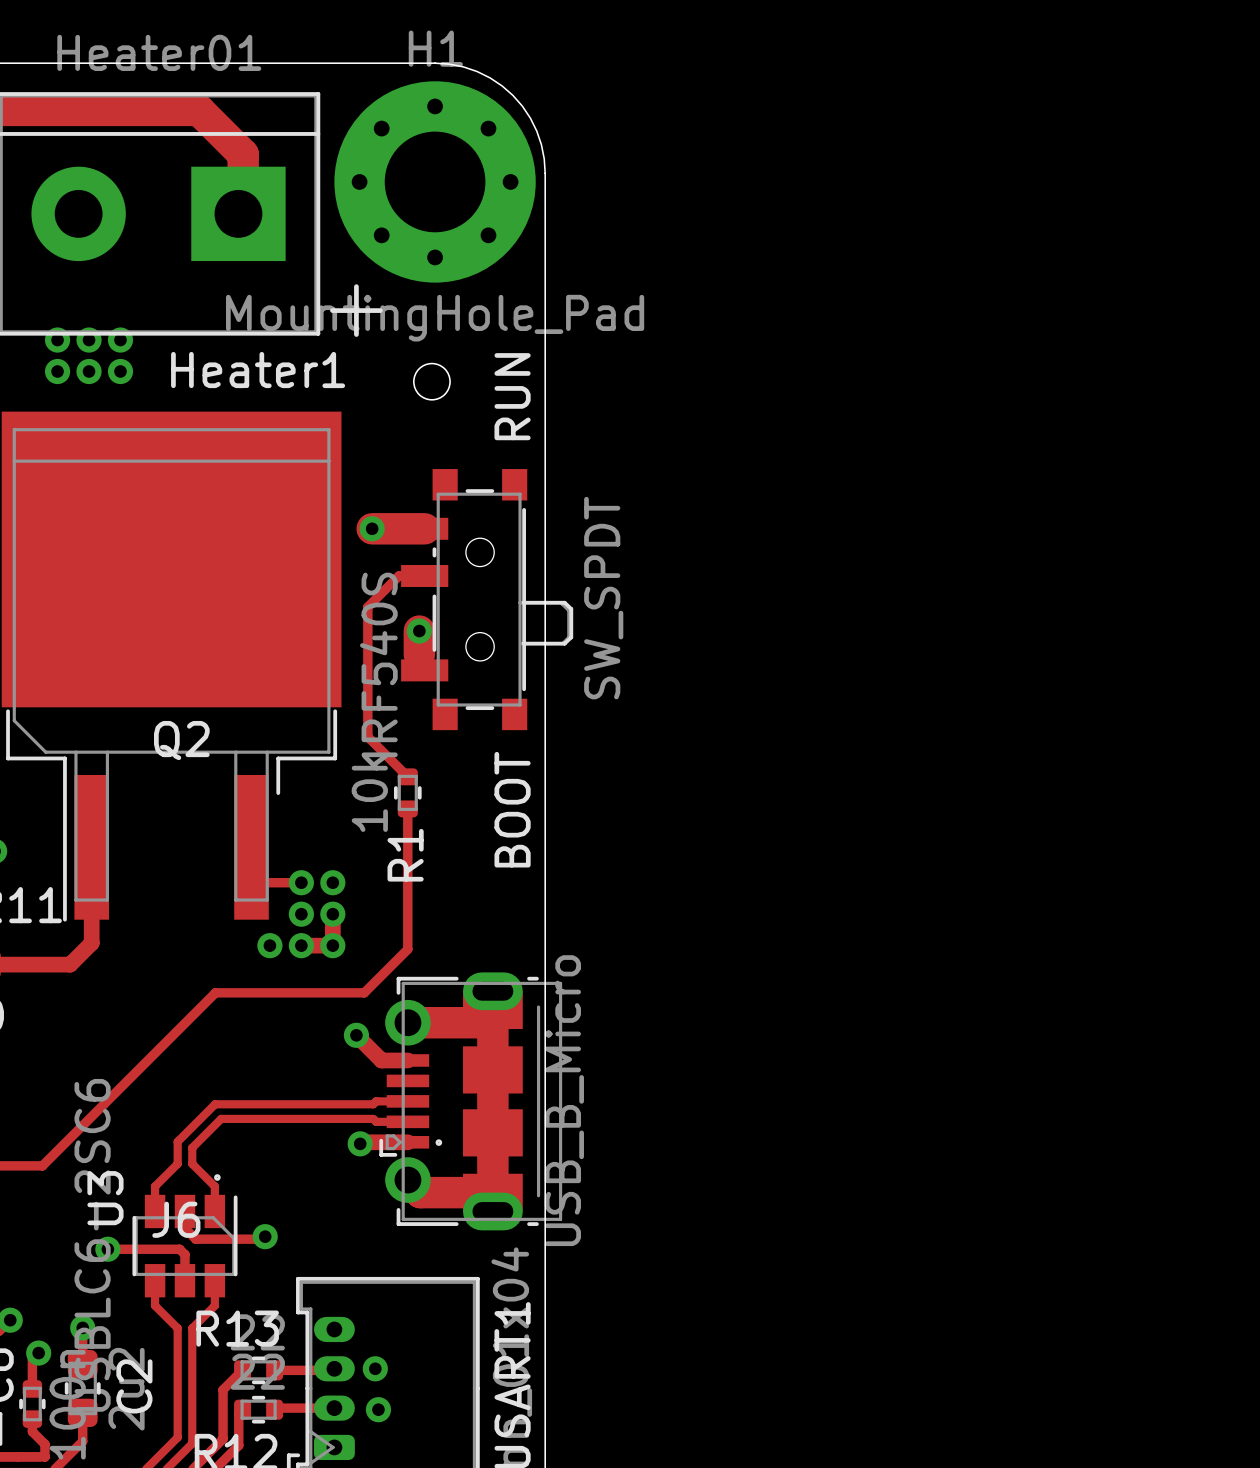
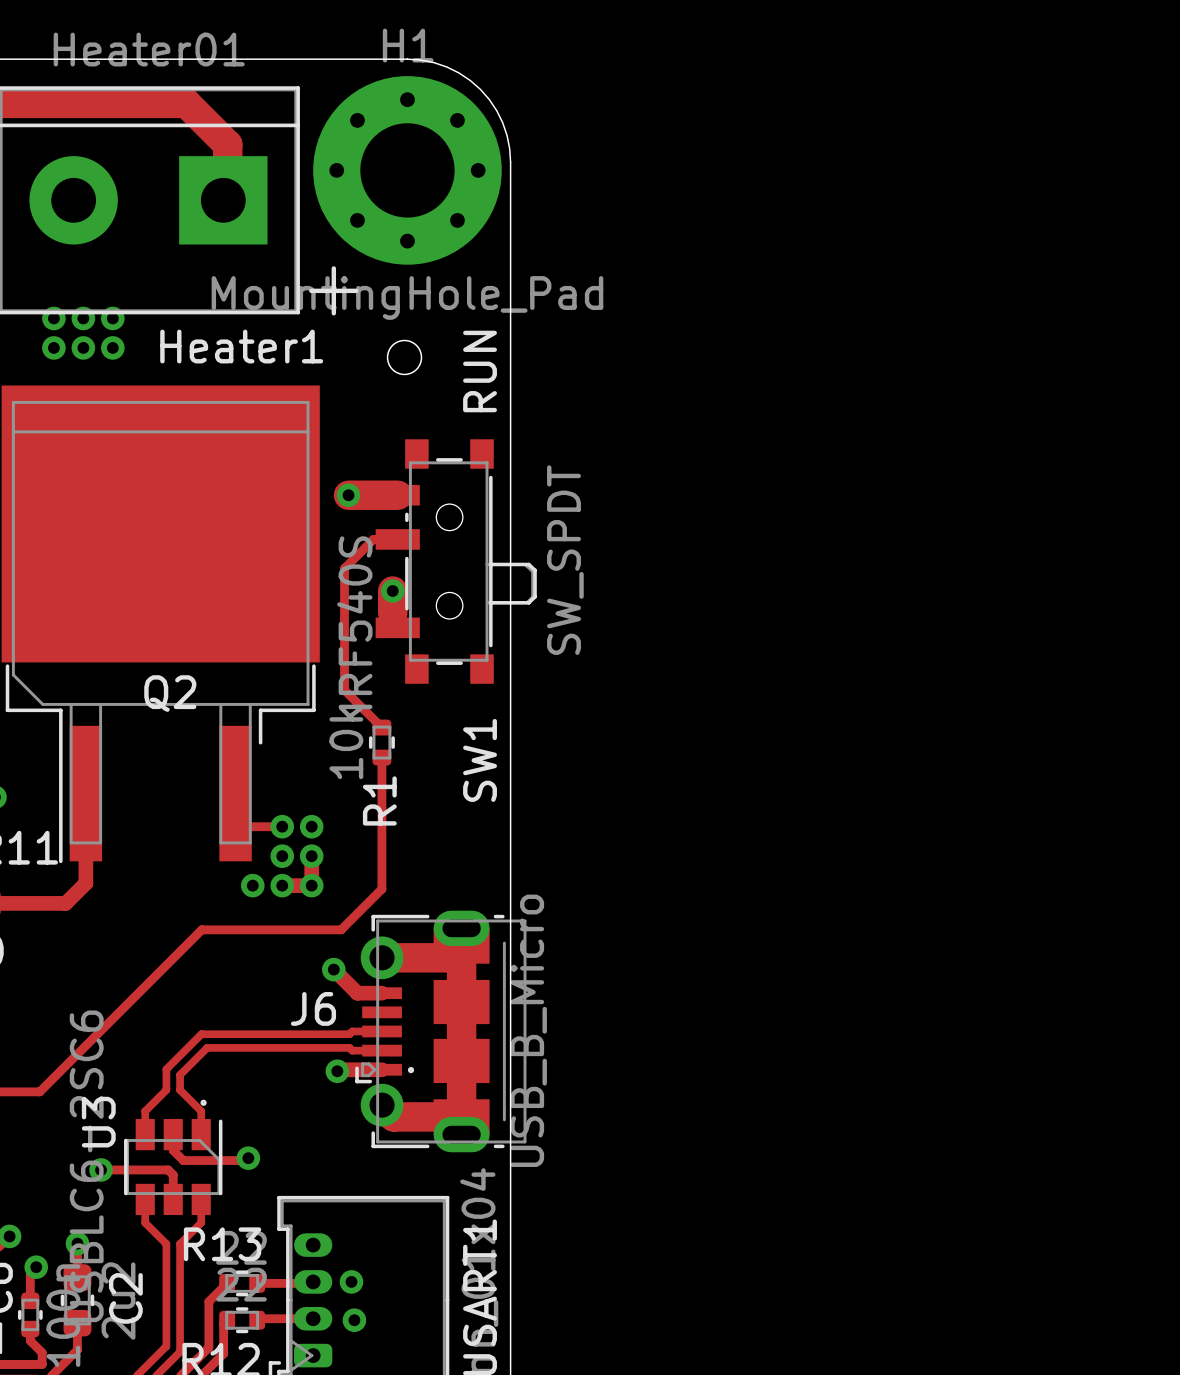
BOOT name: BOOT (512, 809) -> SW1 (480, 760)
J6 name position: J6 (176, 1219) -> J6 (313, 1008)

